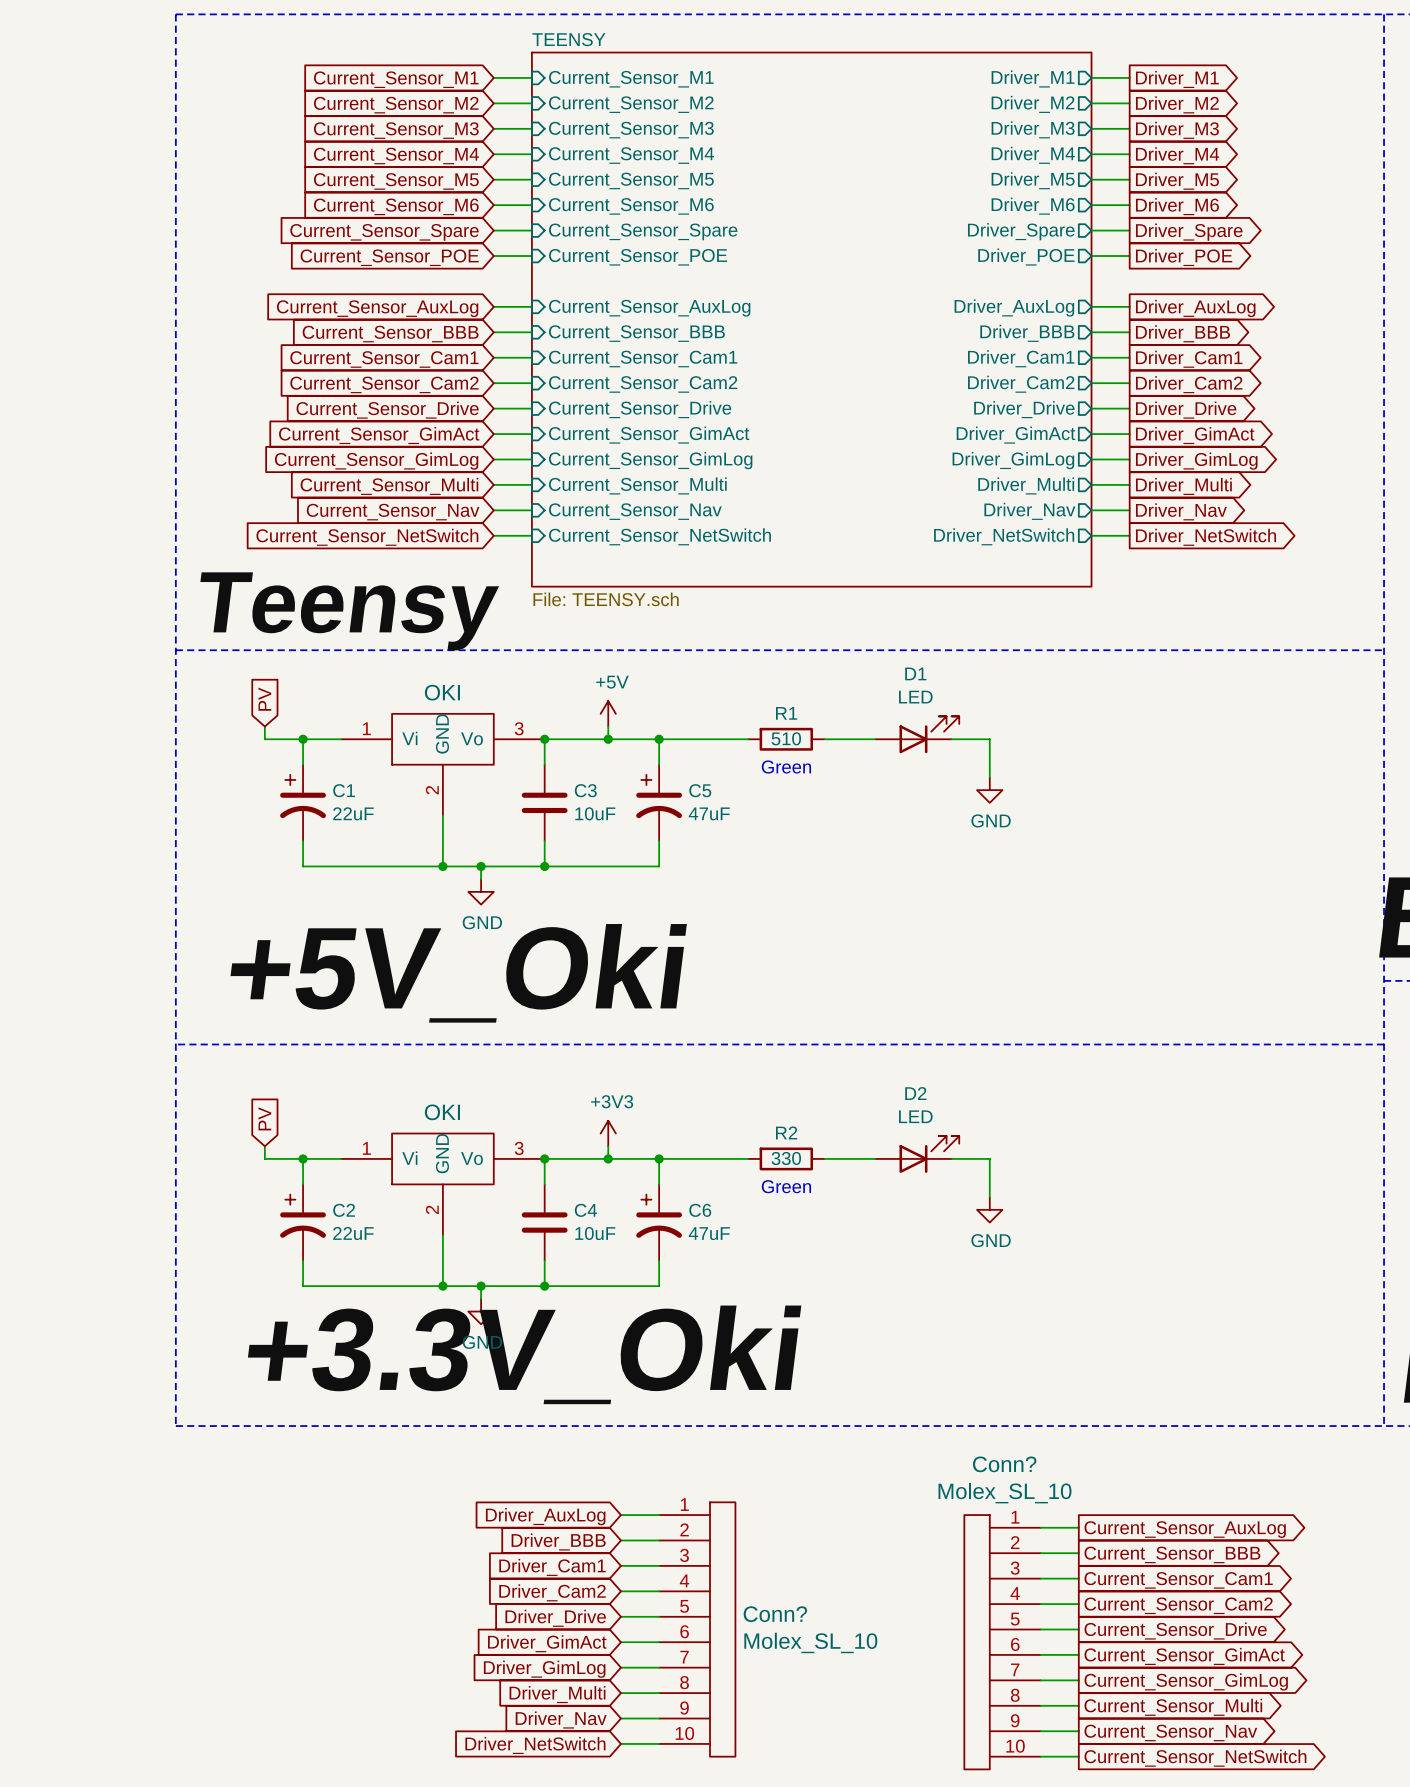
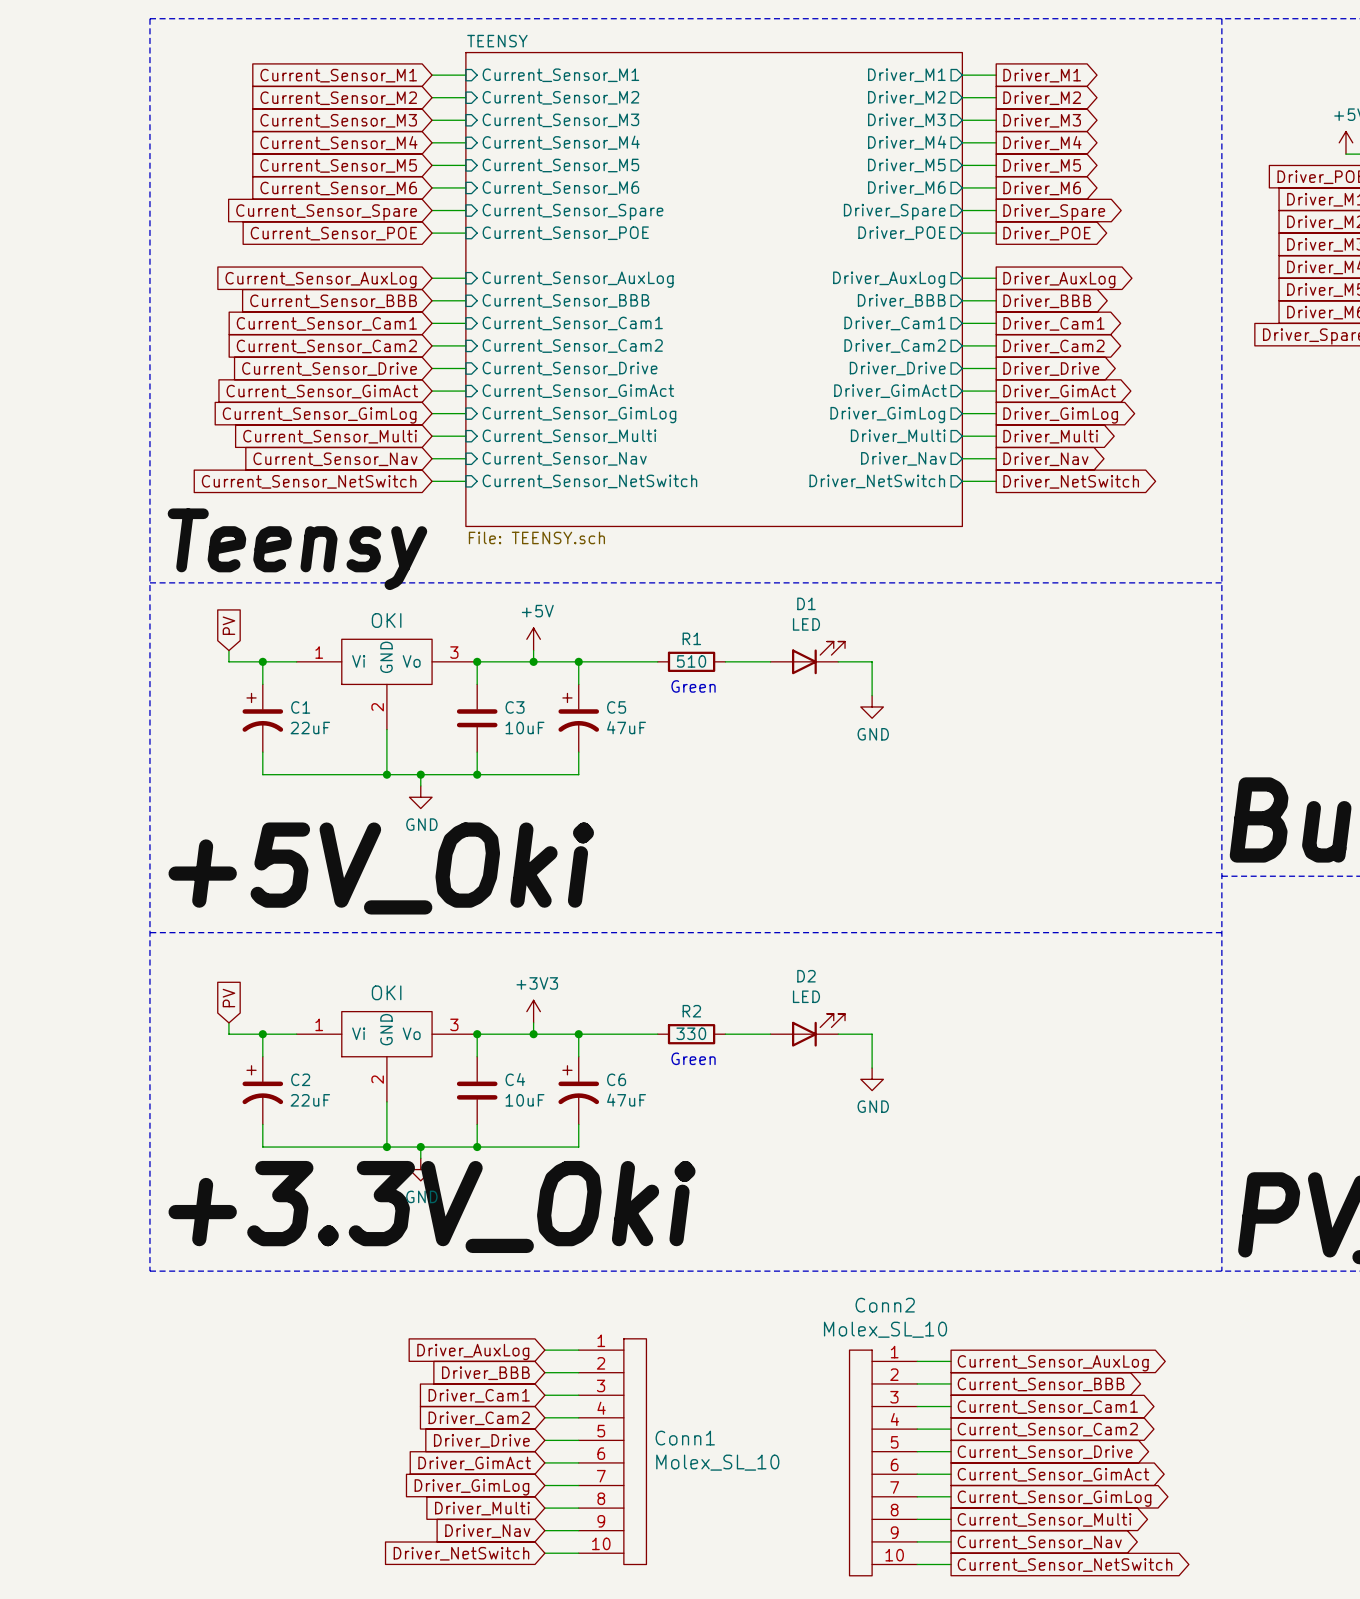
Conn? name: Conn? (1004, 1464) -> Conn2 (885, 1305)
Conn? name: Conn? (775, 1614) -> Conn1 (685, 1438)

